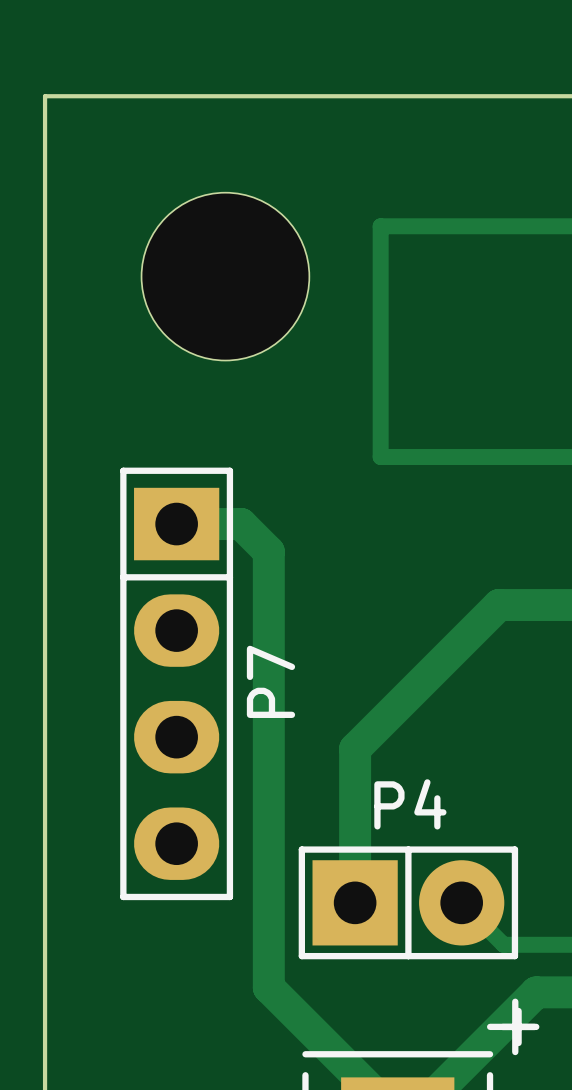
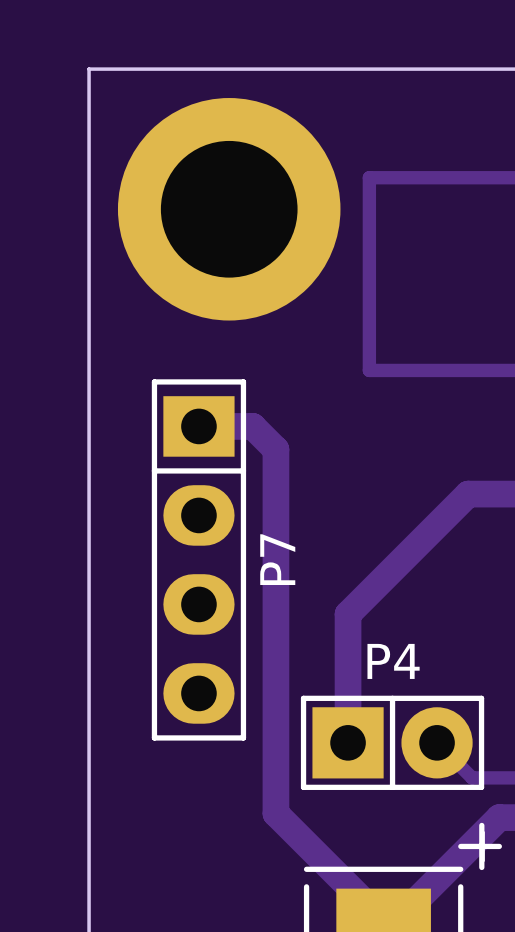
part footprint: [141, 192, 310, 361] -> [117, 98, 341, 321]

